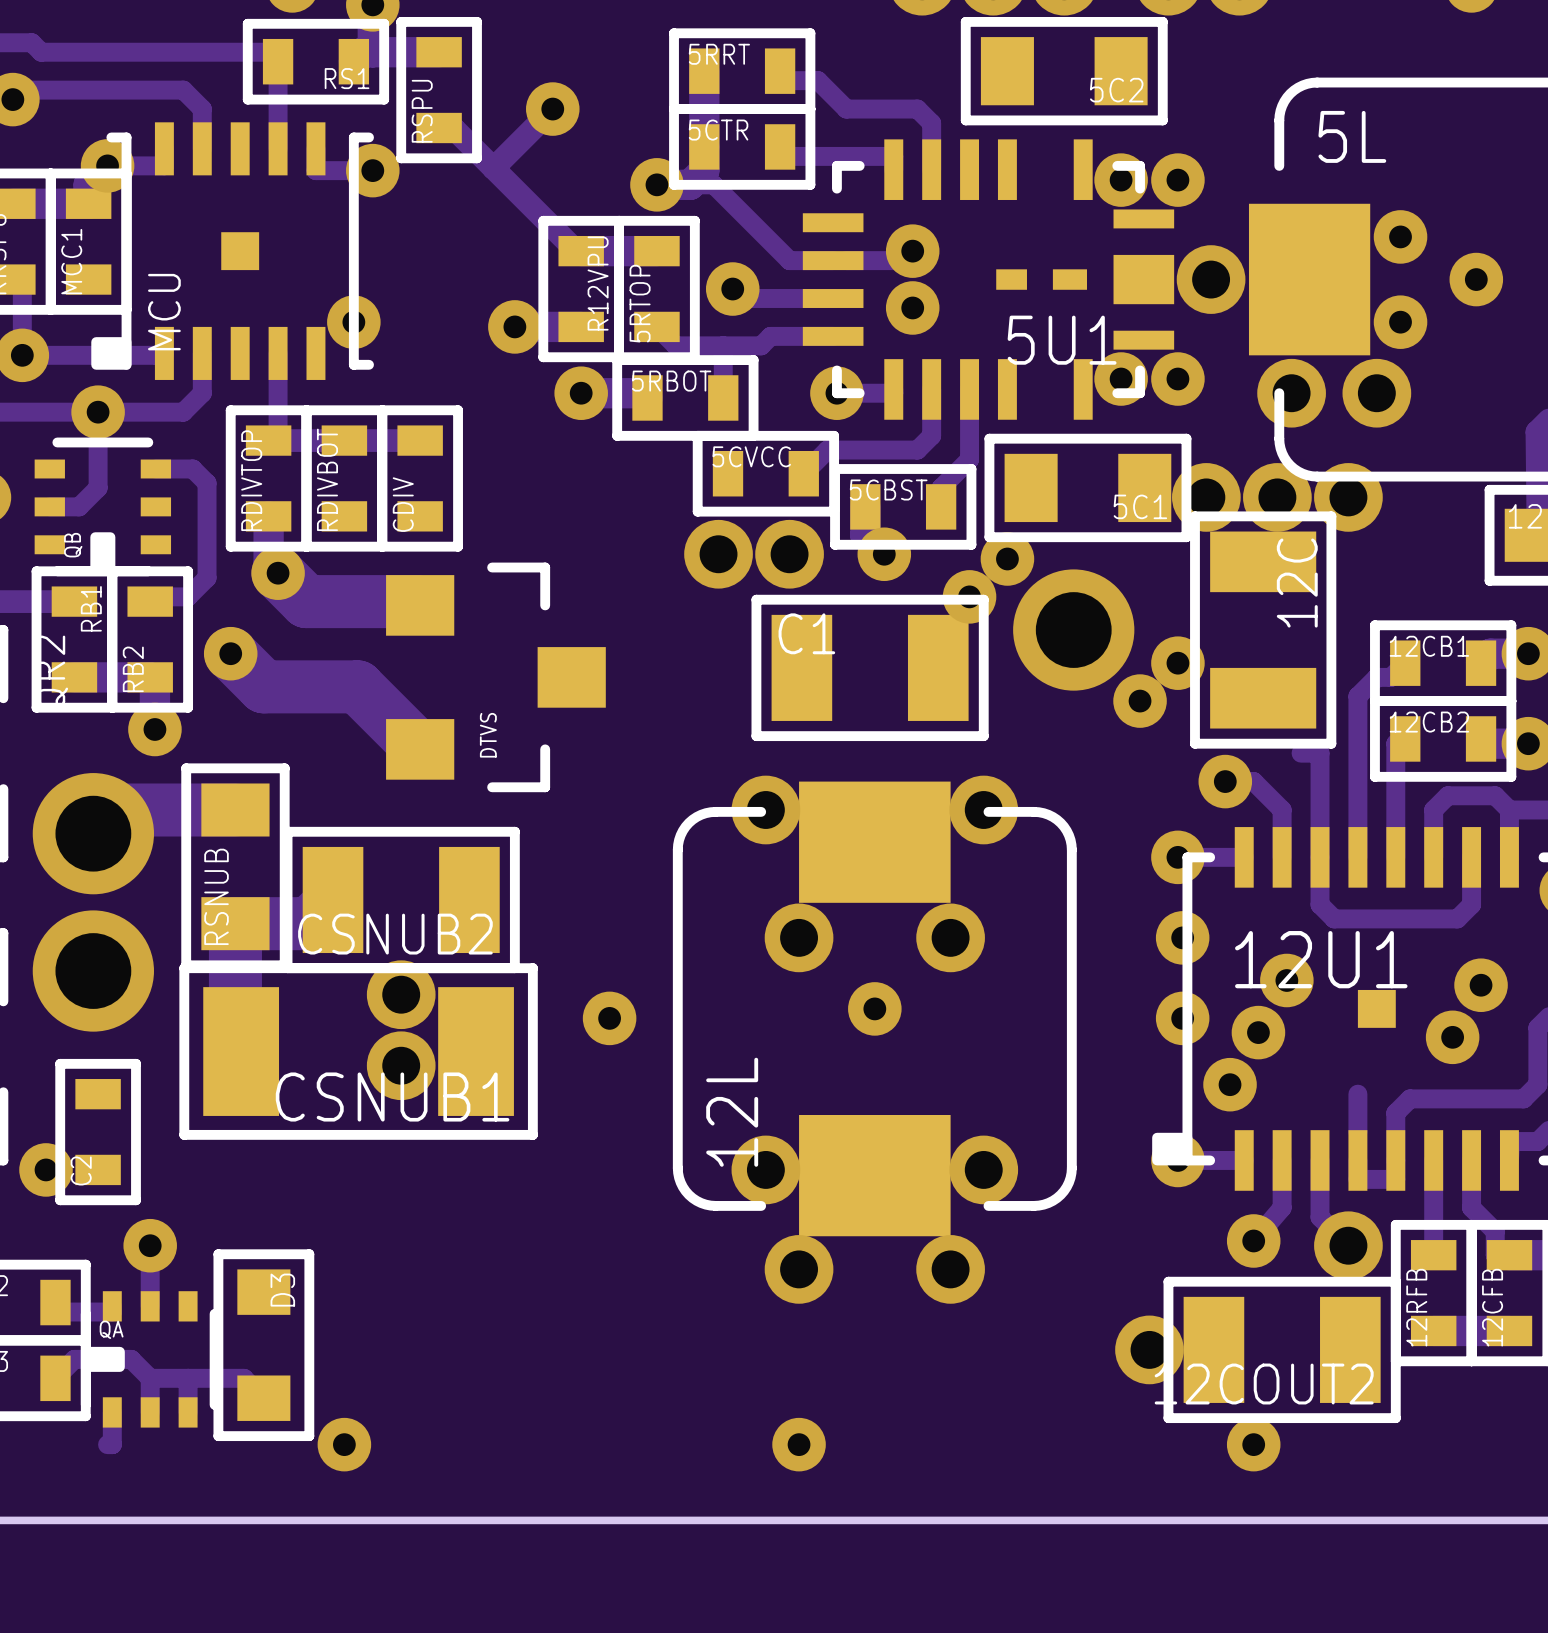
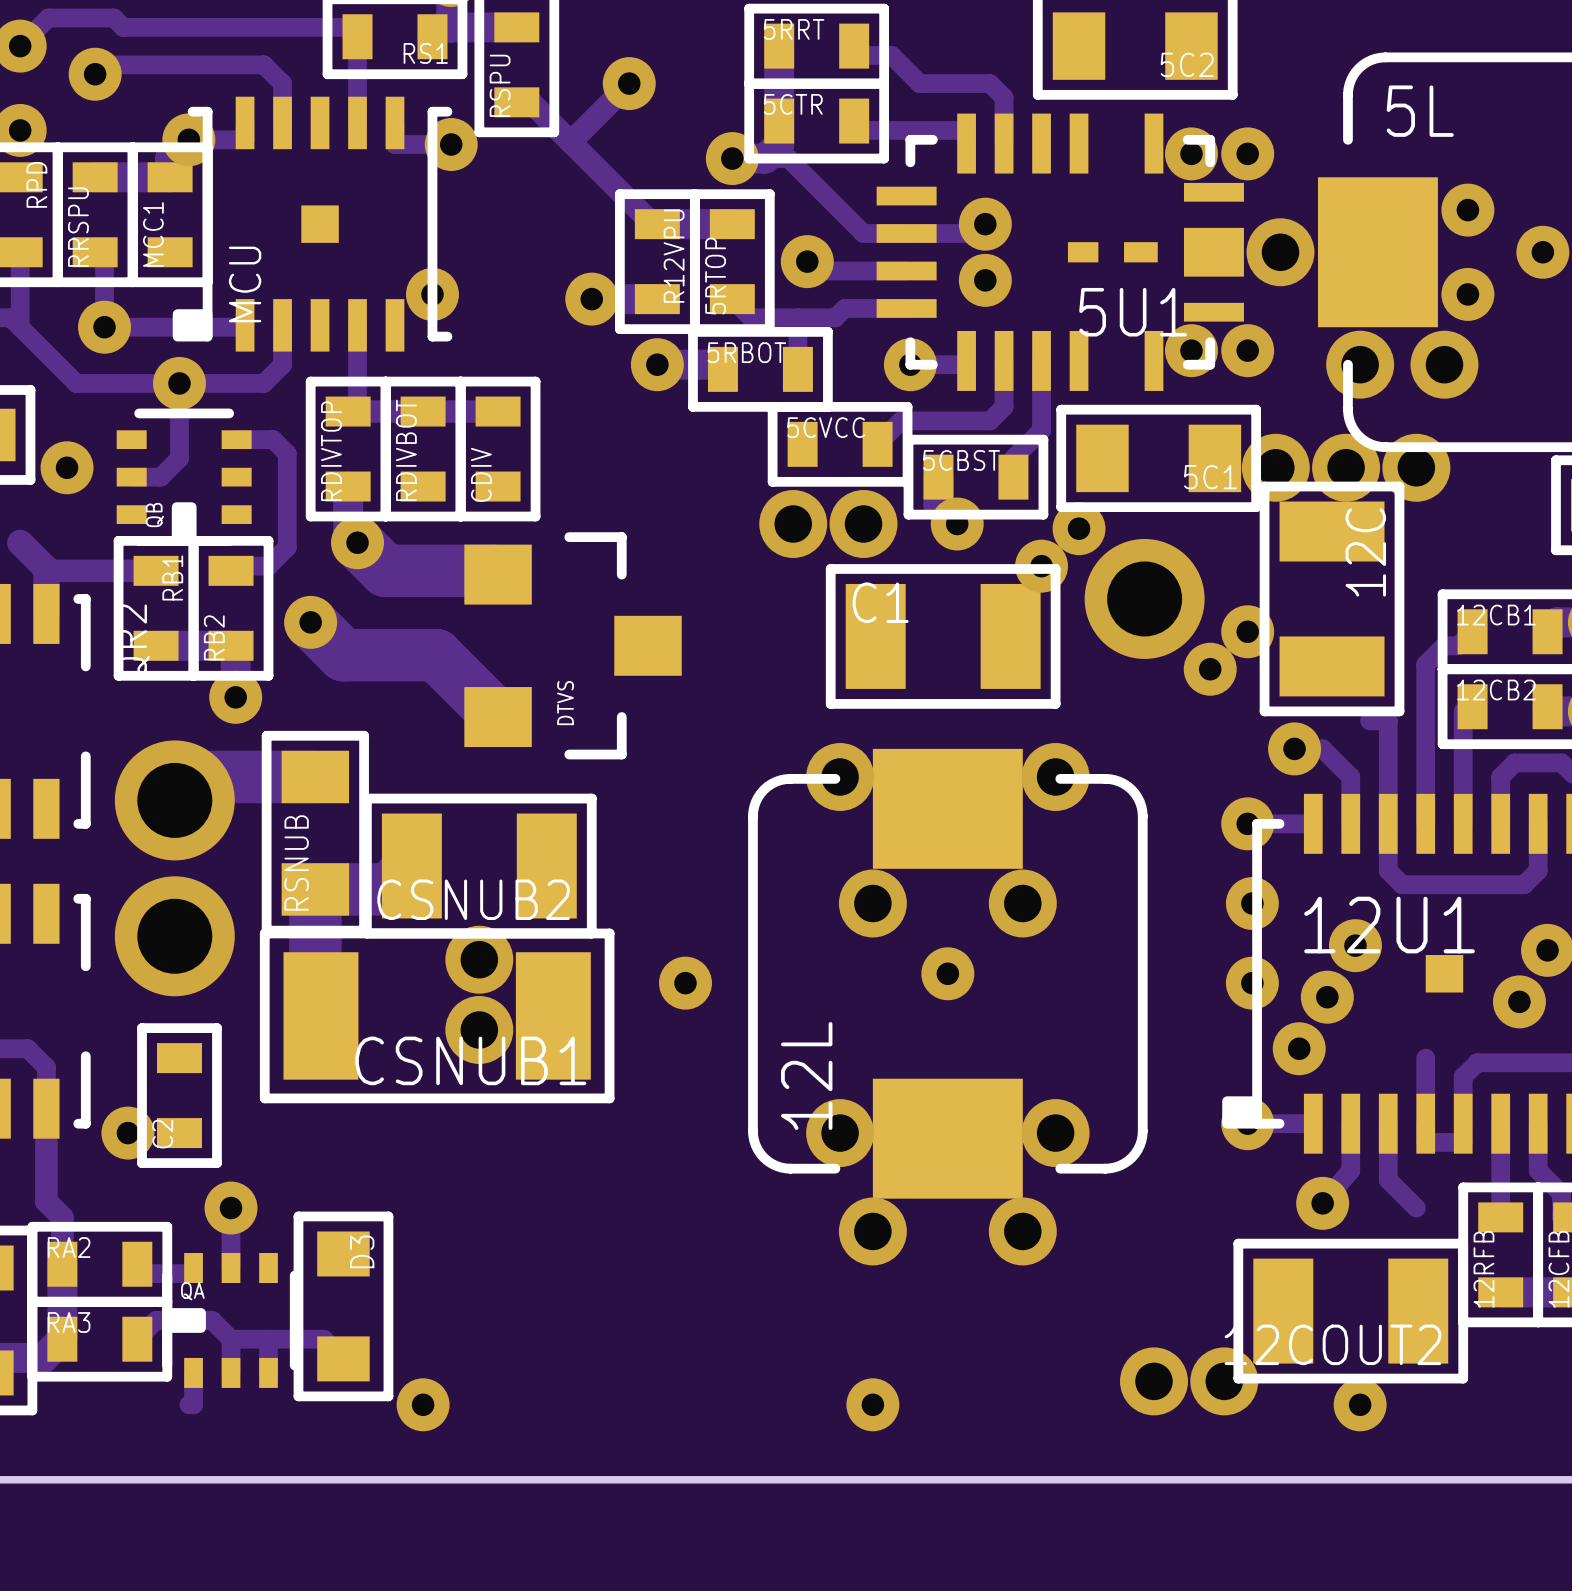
via: (1348, 1245) -> none
via: (1149, 1349) -> none
via: none -> (1154, 1381)
via: none -> (1224, 1381)
via position: (1253, 1444) -> (1360, 1404)

